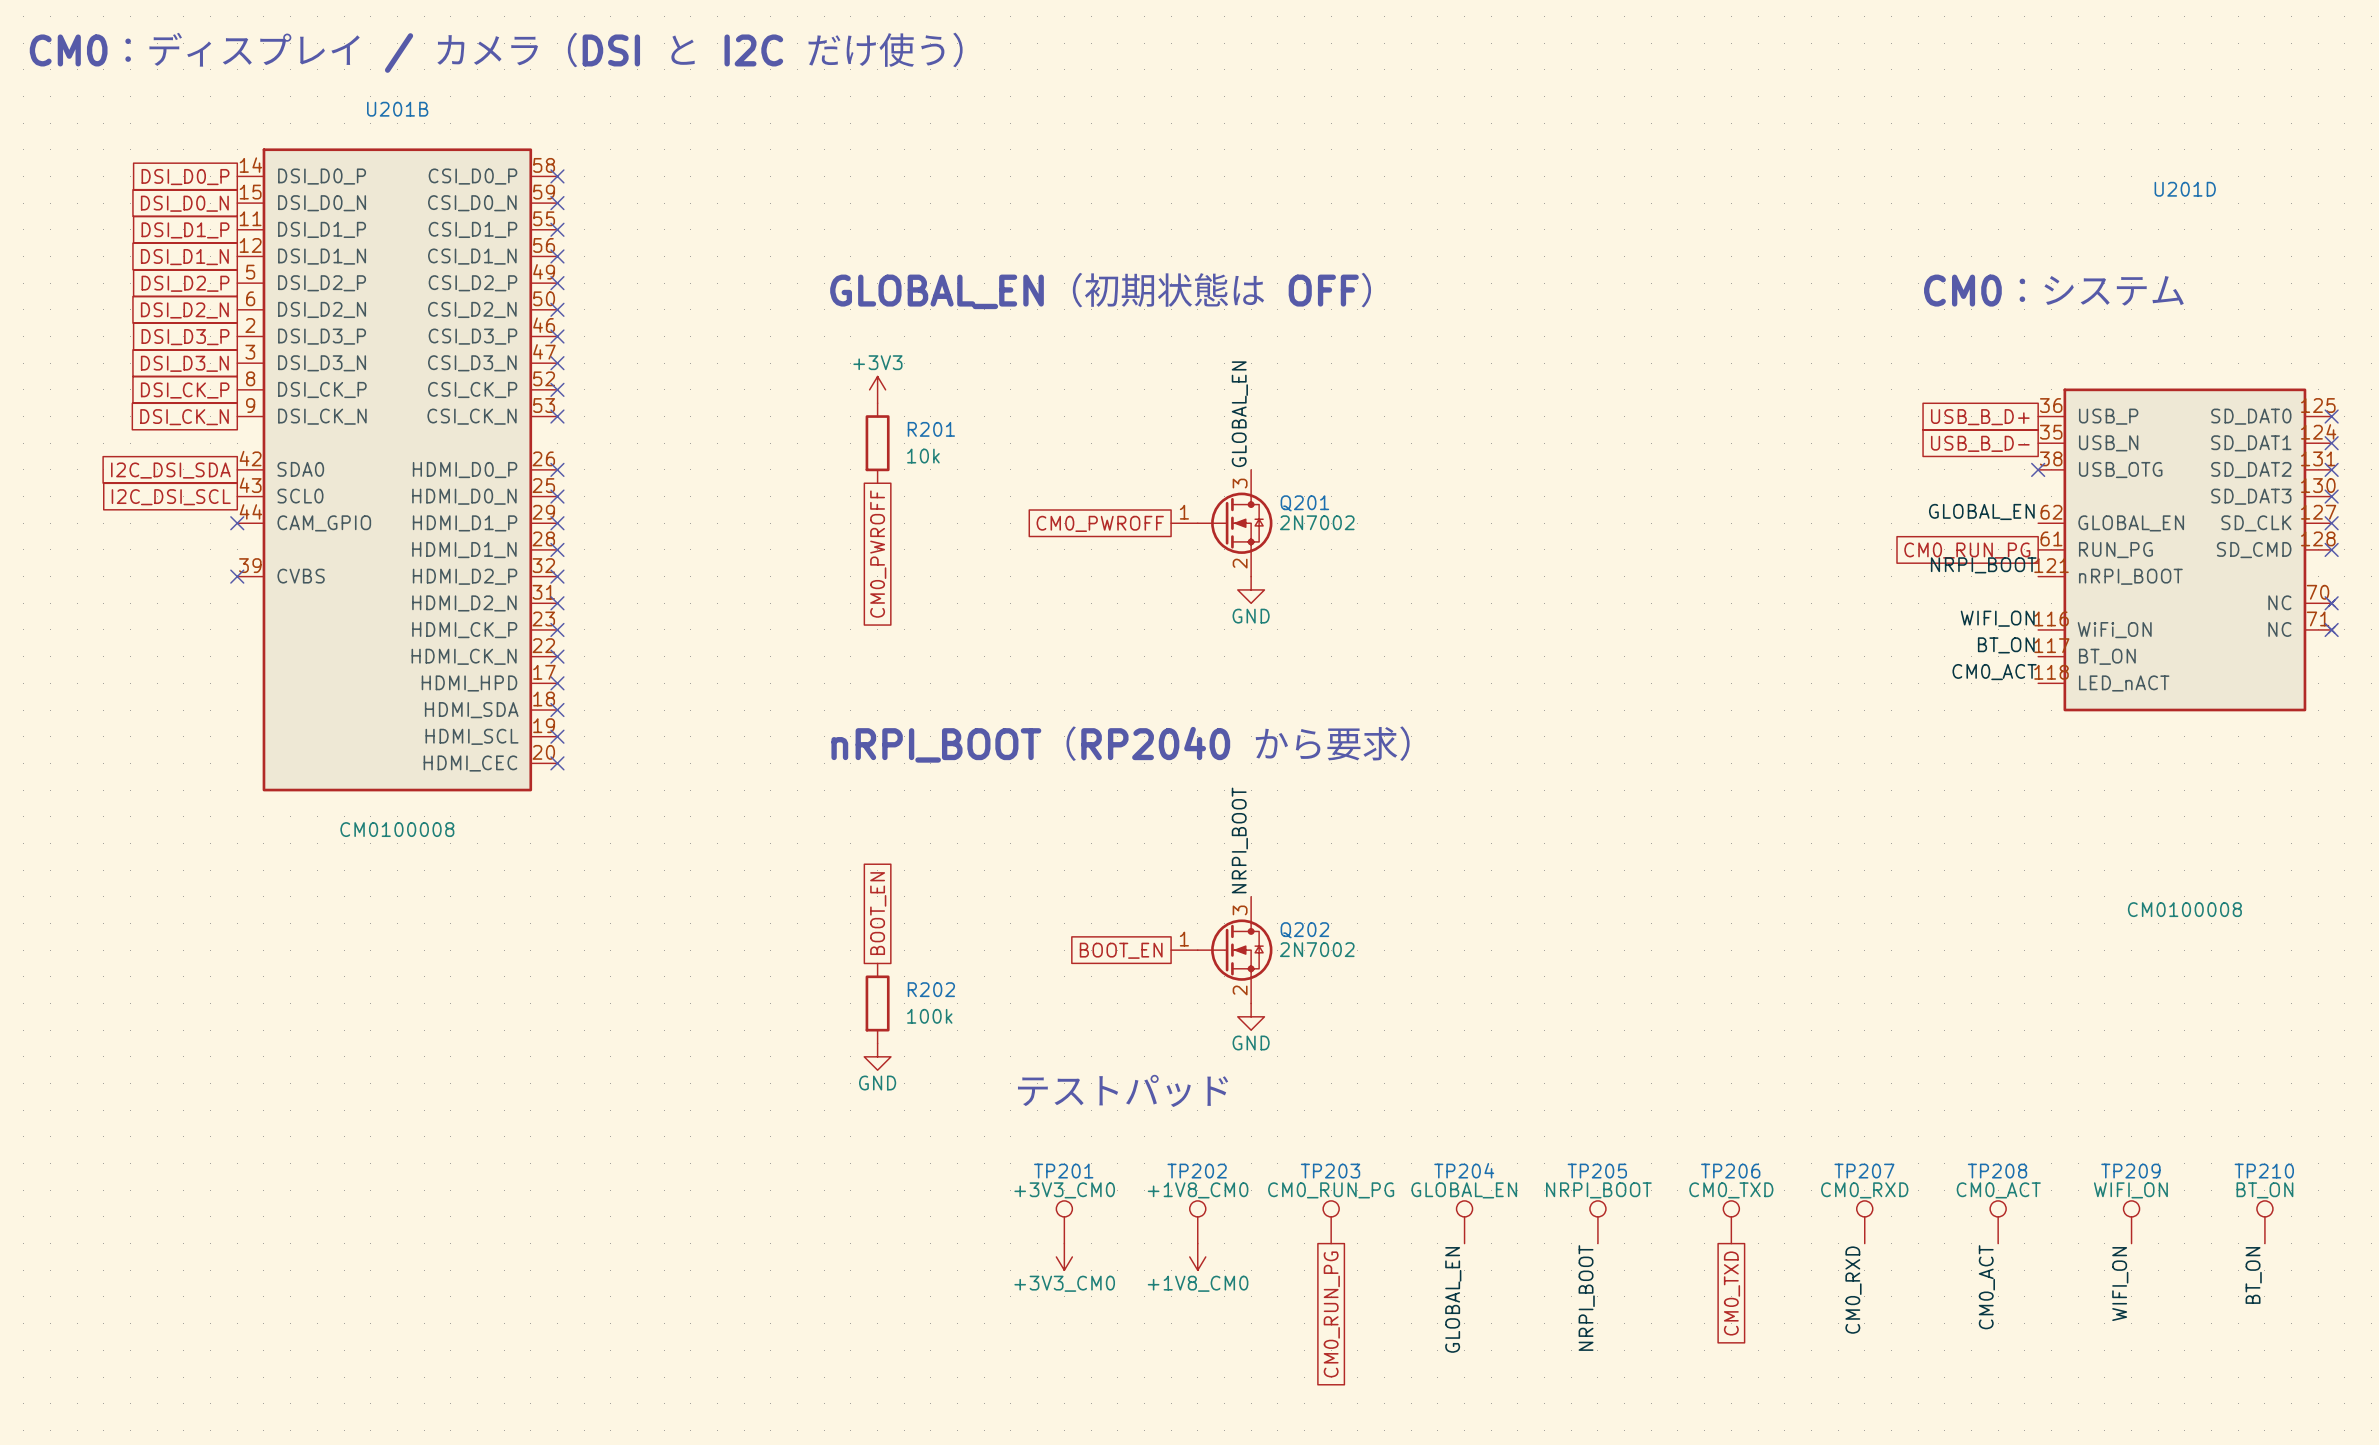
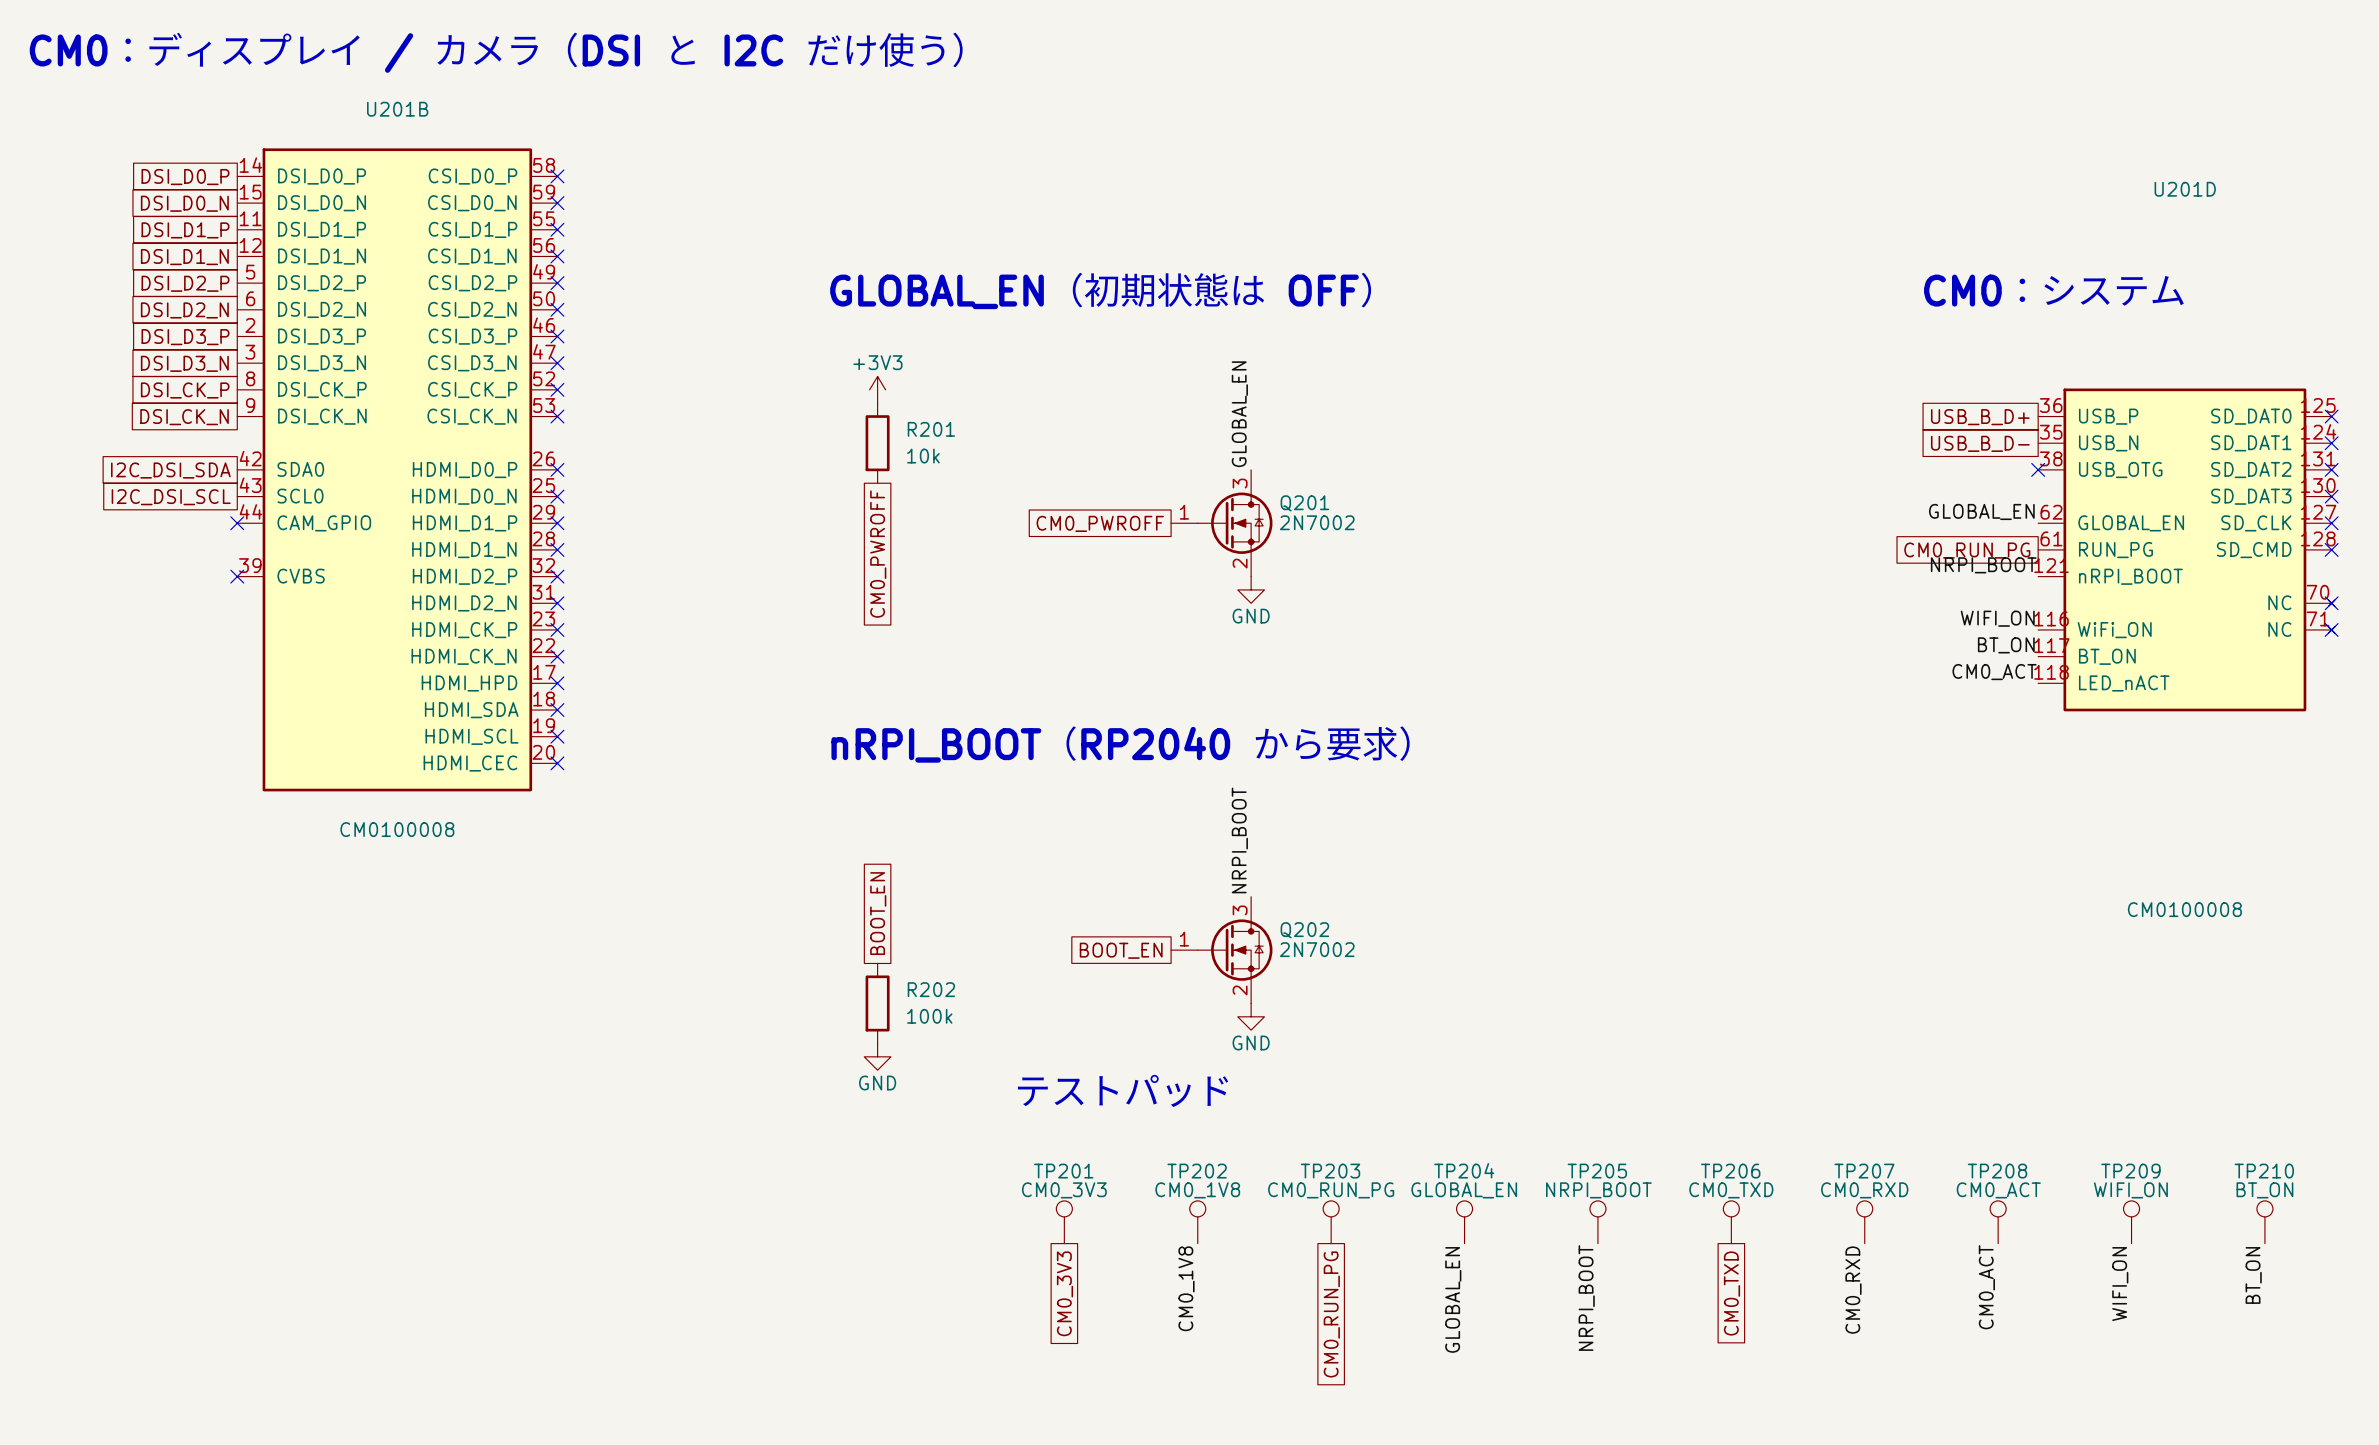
TP201 value: +3V3_CM0 (1064, 1190) -> CM0_3V3 (1064, 1190)
TP202 value: +1V8_CM0 (1198, 1190) -> CM0_1V8 (1197, 1190)
power symbol: +3V3_CM0 (1064, 1256) -> none
power symbol: +1V8_CM0 (1197, 1256) -> none
label: none -> CM0_1V8 (1186, 1288)
global label: none -> CM0_3V3 (1064, 1293)

